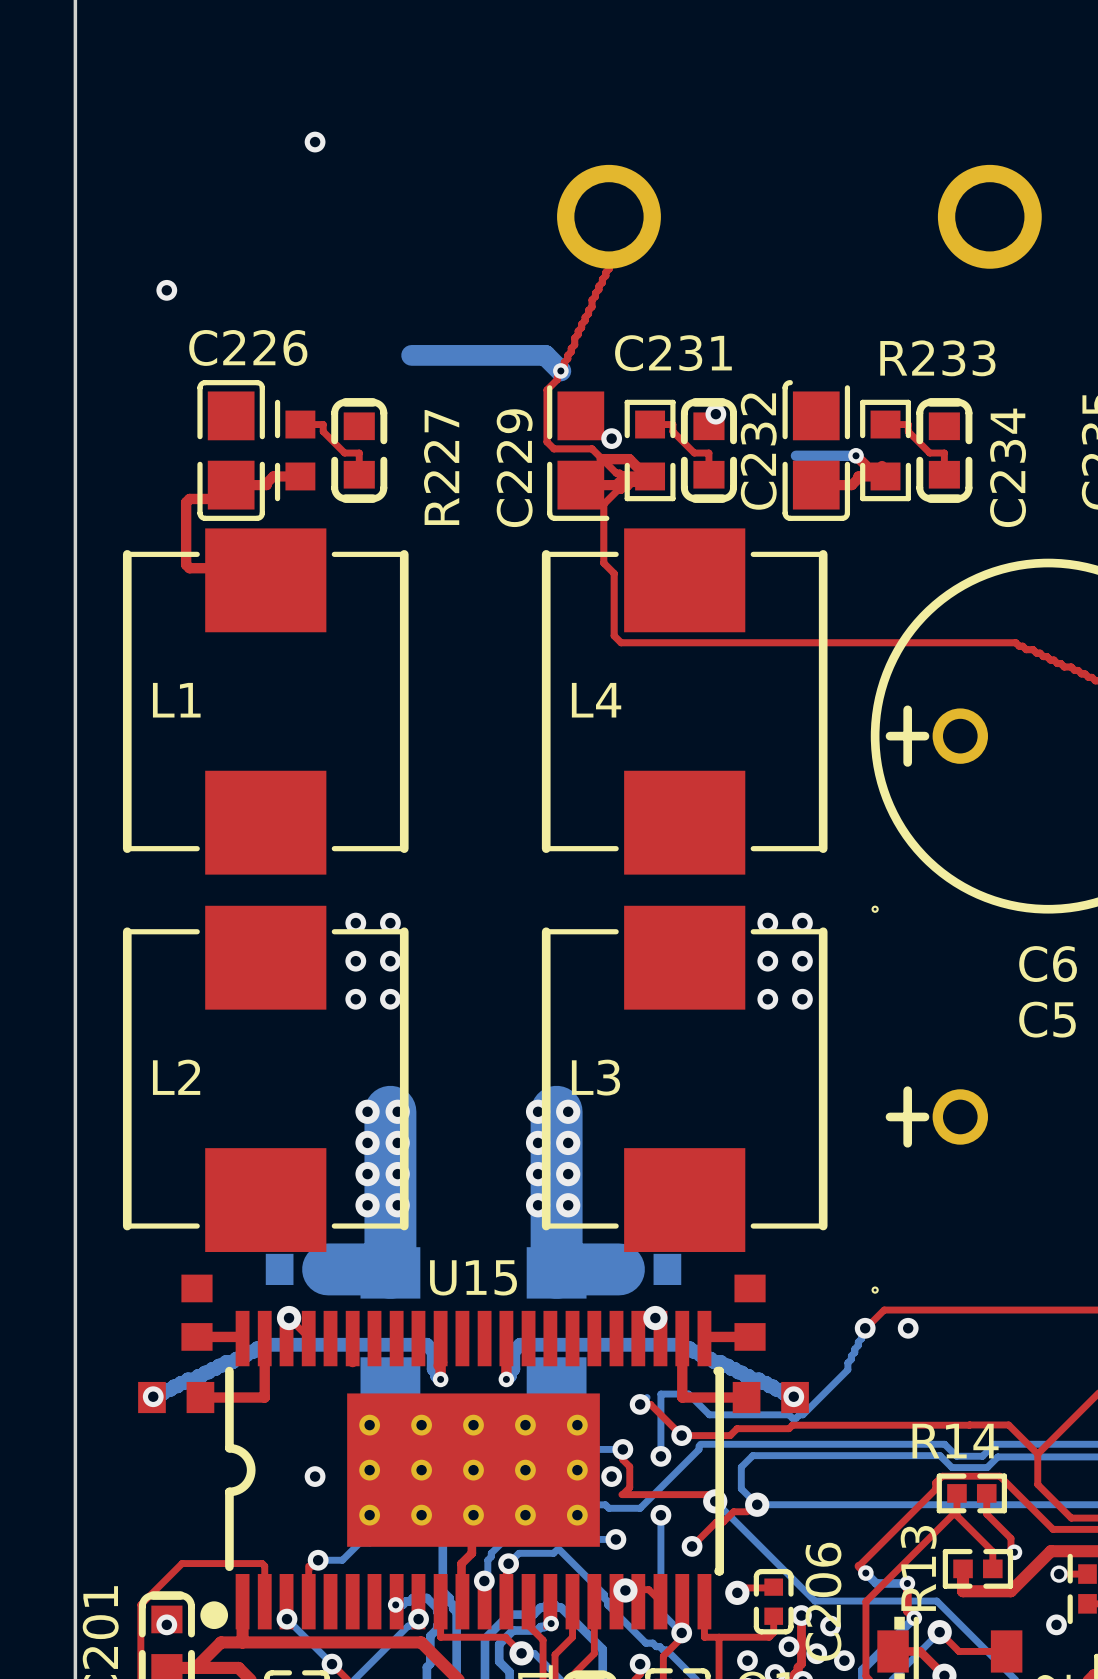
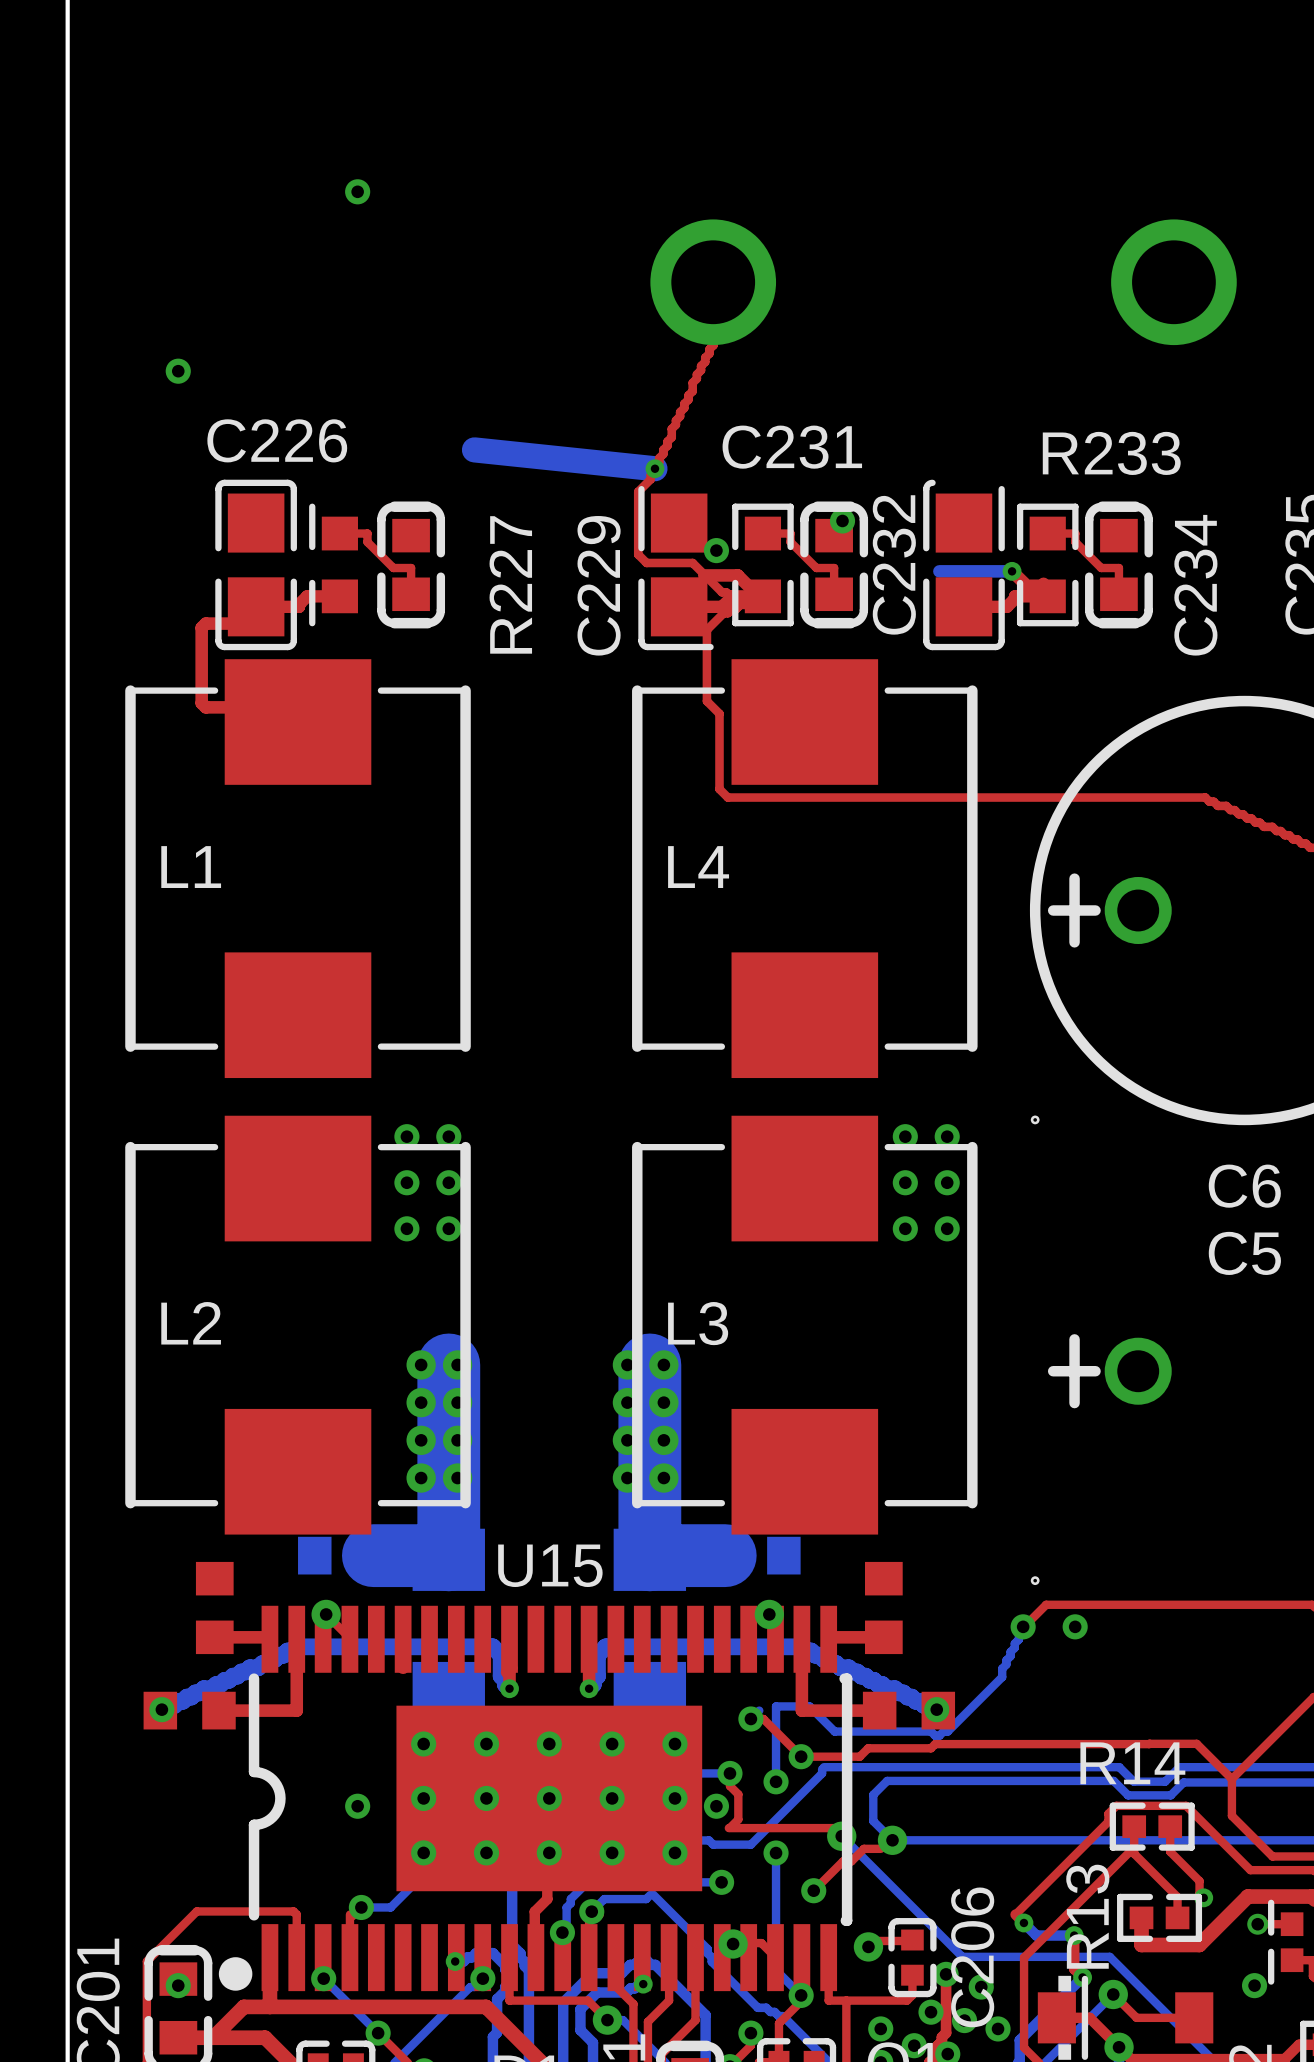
bottom track: (411, 355) (545, 355) (560, 370) -> (474, 449) (654, 468)

